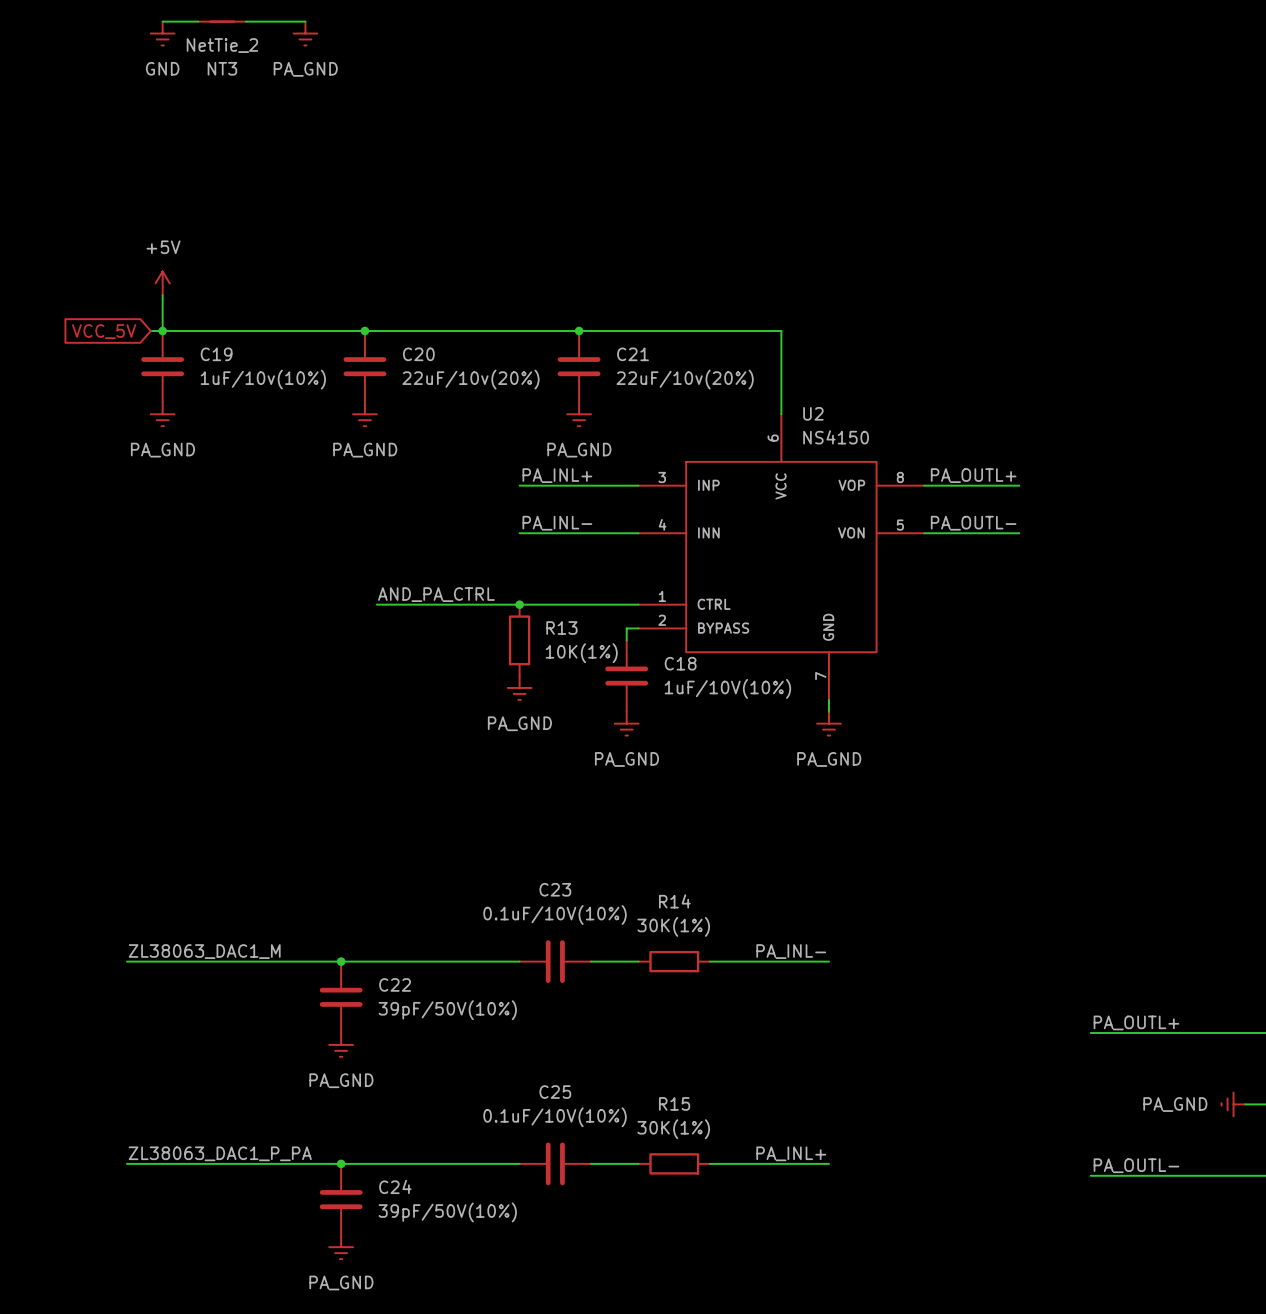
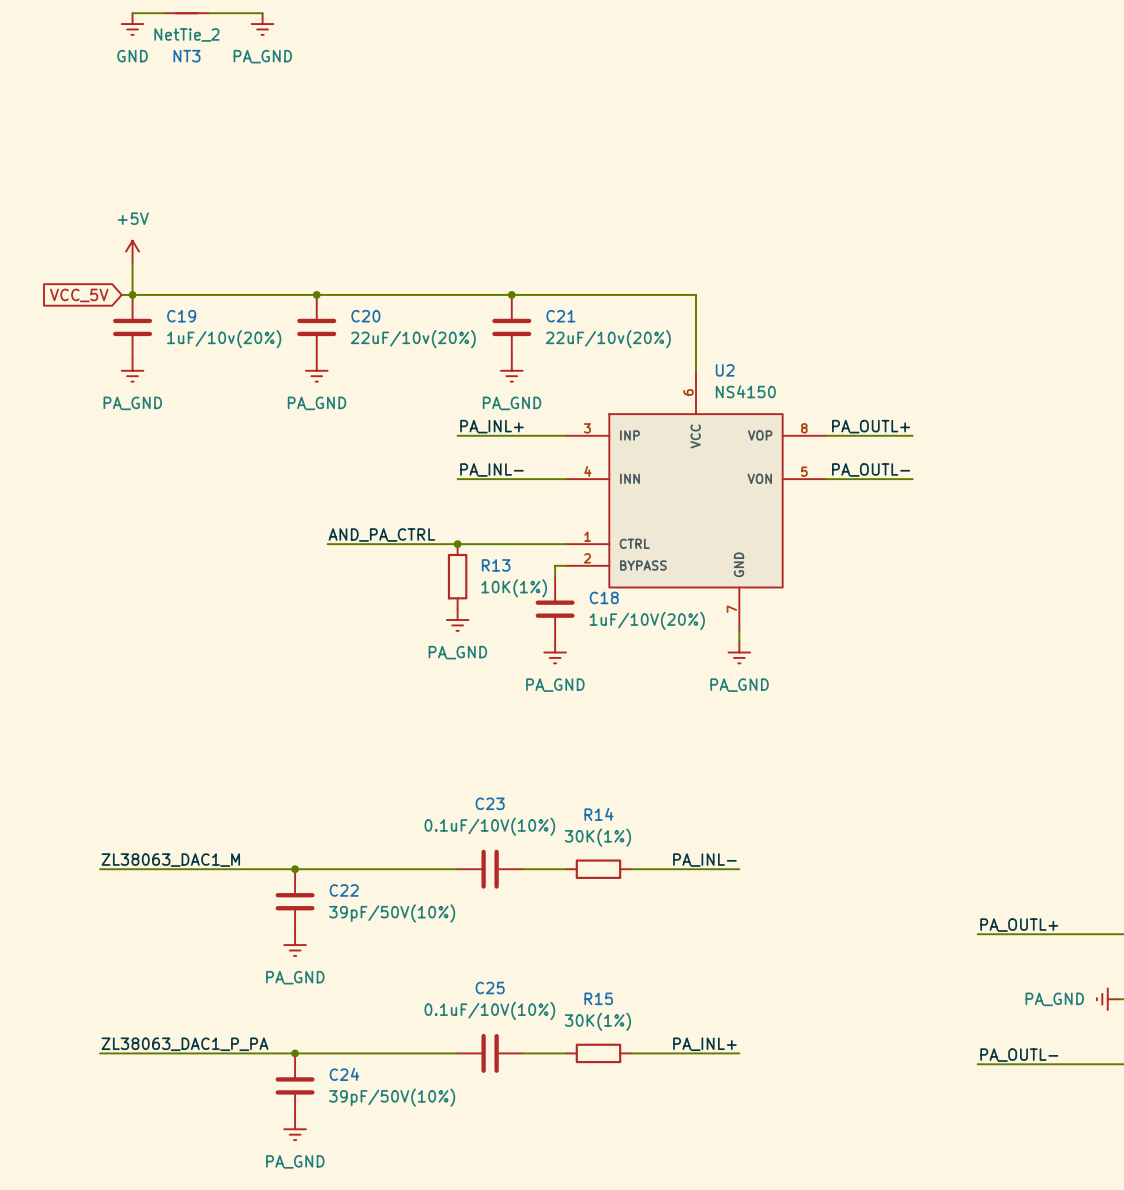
C19 value: 1uF/10v(10%) (263, 379) -> 1uF/10v(20%) (224, 339)
C18 value: 1uF/10V(10%) (727, 688) -> 1uF/10V(20%) (647, 620)

